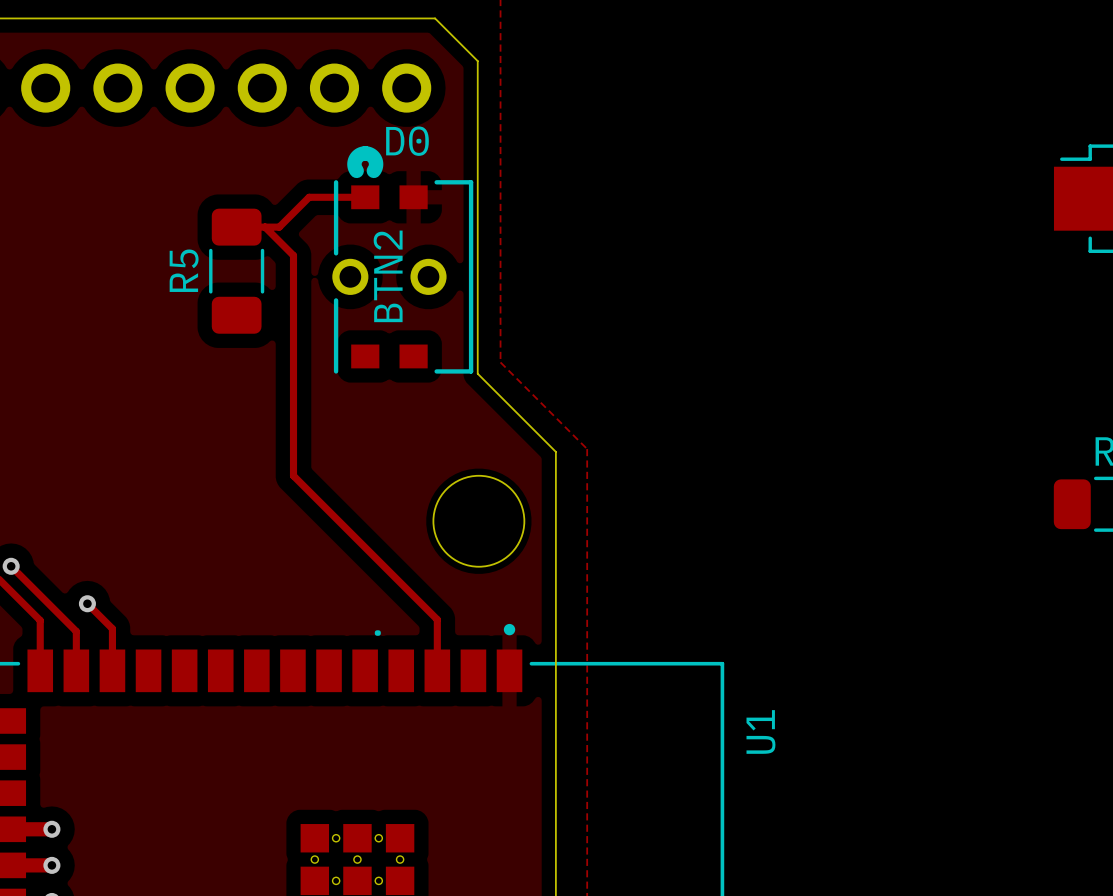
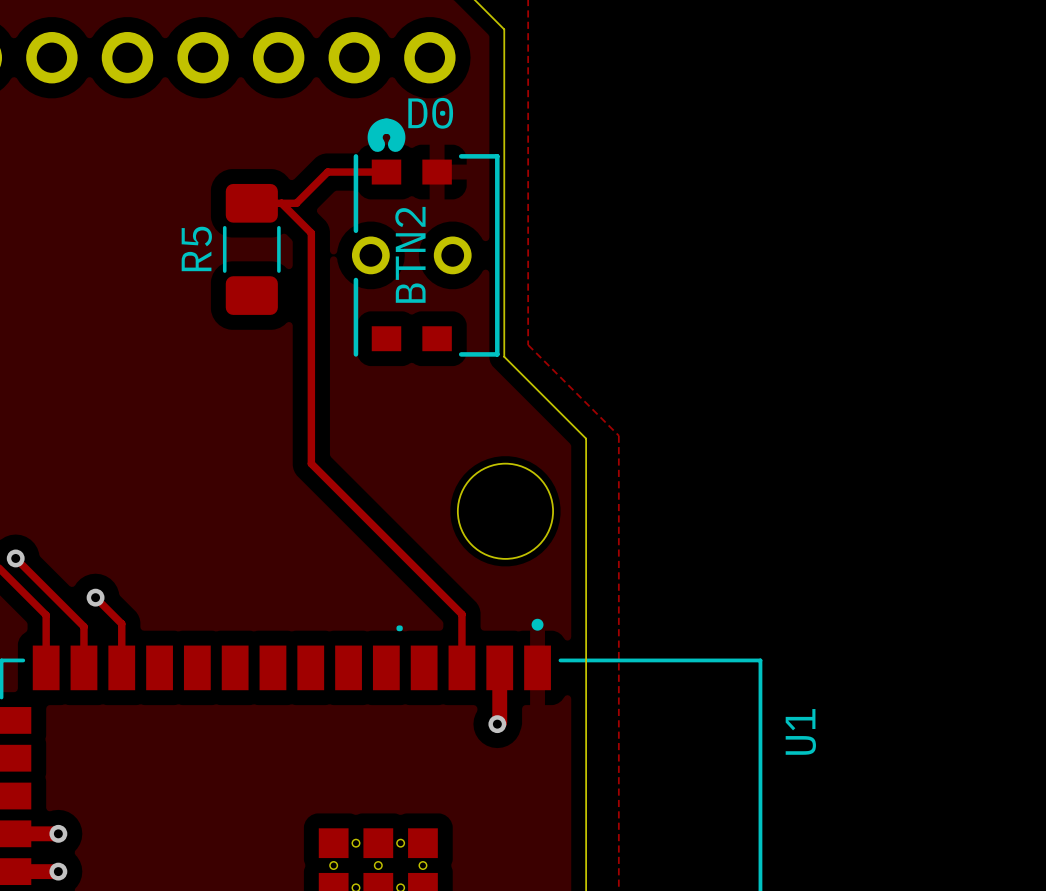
track: none -> (499, 667) (499, 721) (497, 724)
via: none -> (497, 724)

